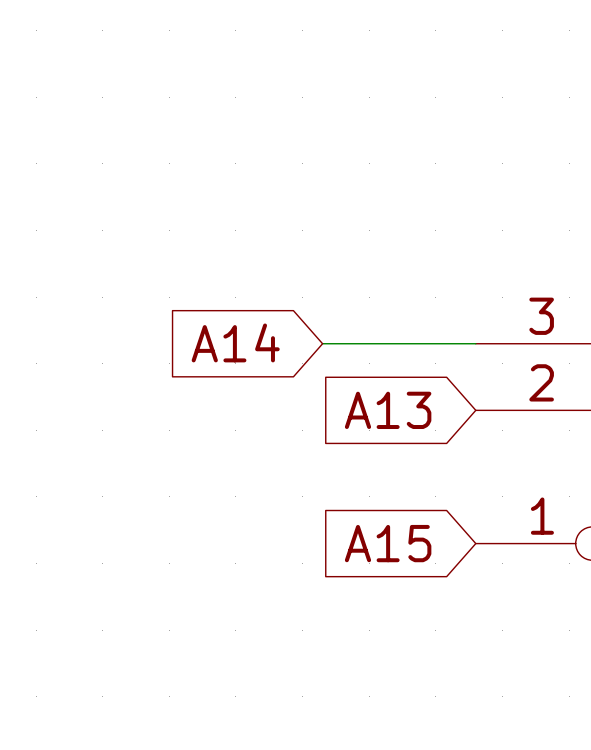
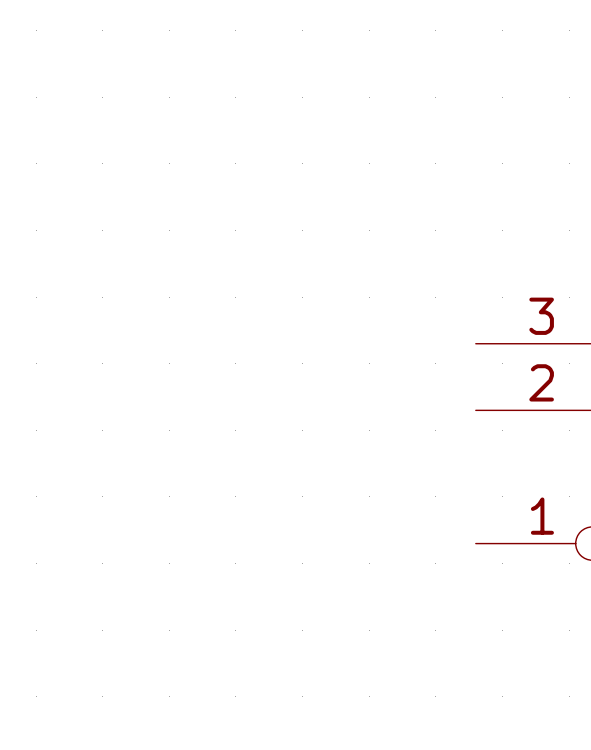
global label: A14 (235, 342) -> none
wire: (322, 343) (475, 343) -> none
global label: A13 (388, 410) -> none
global label: A15 (388, 543) -> none

